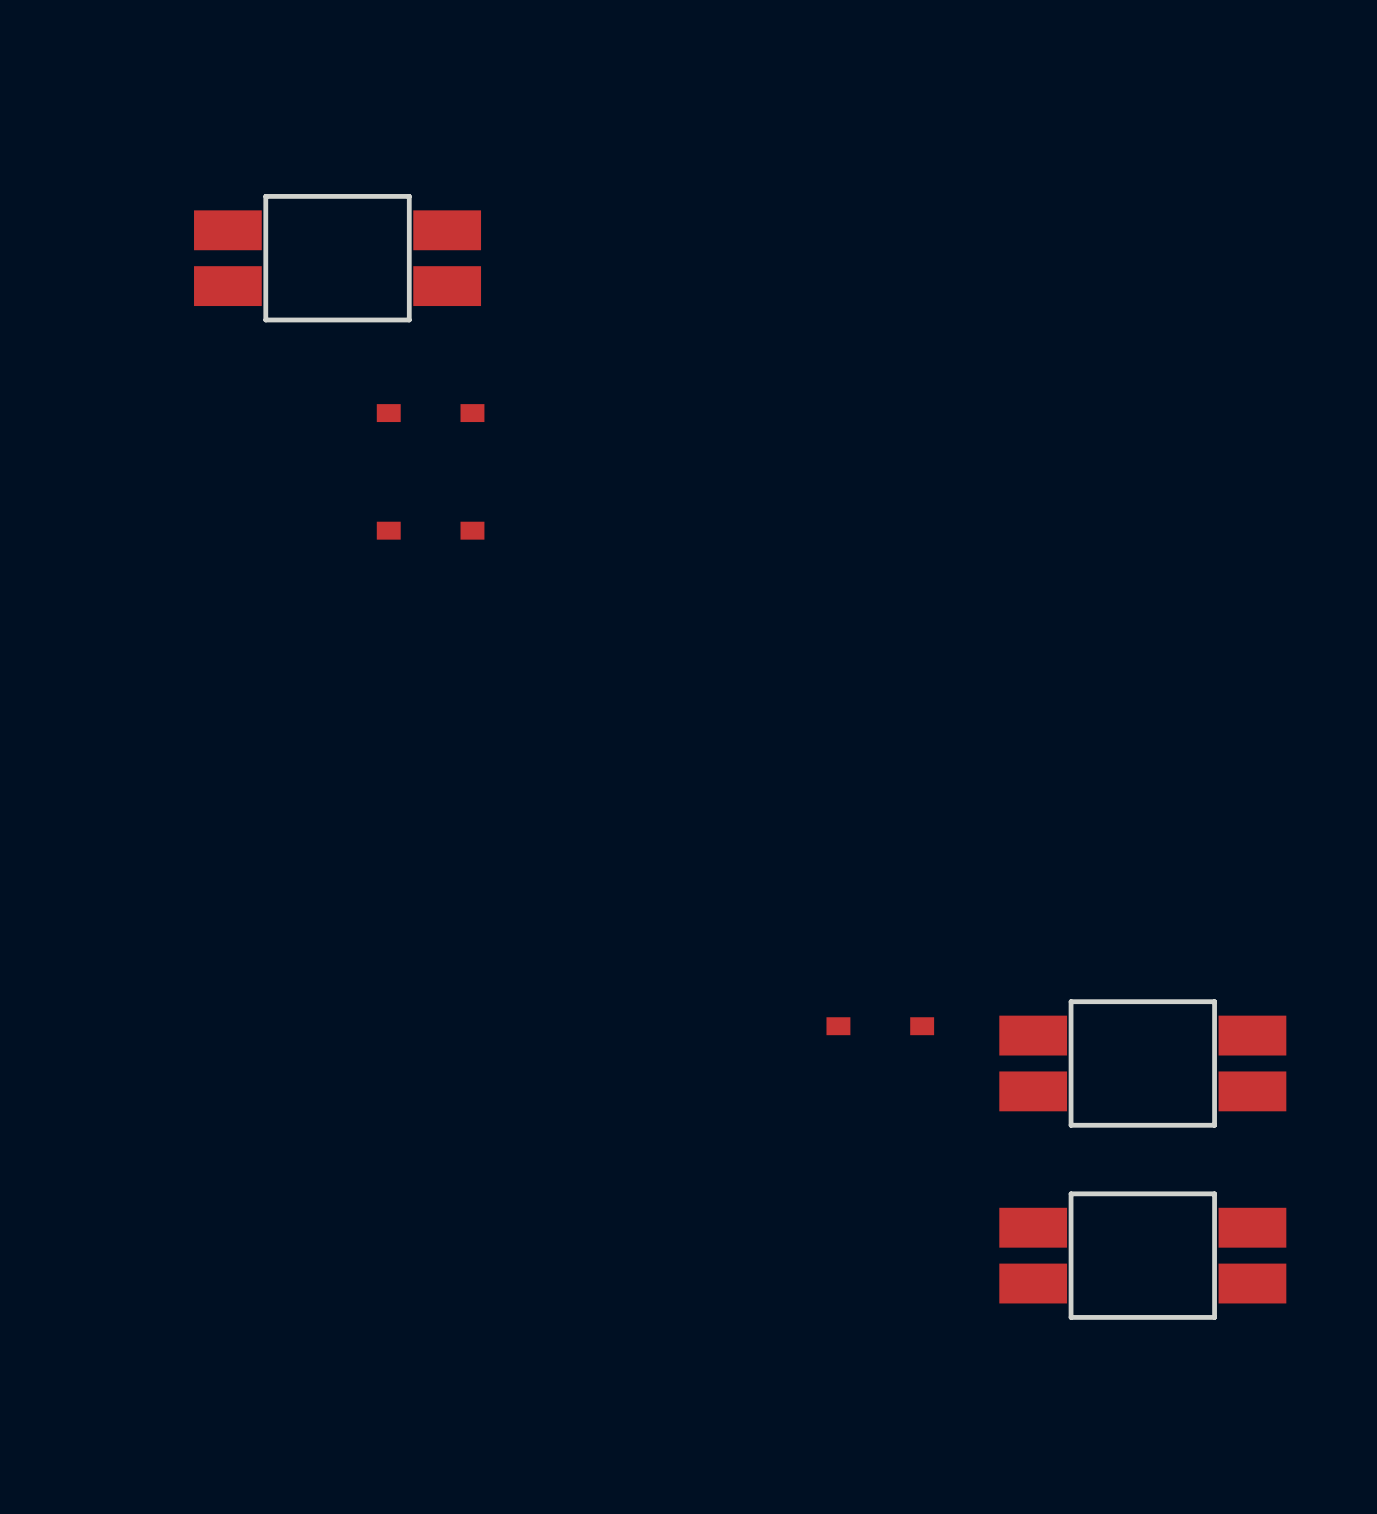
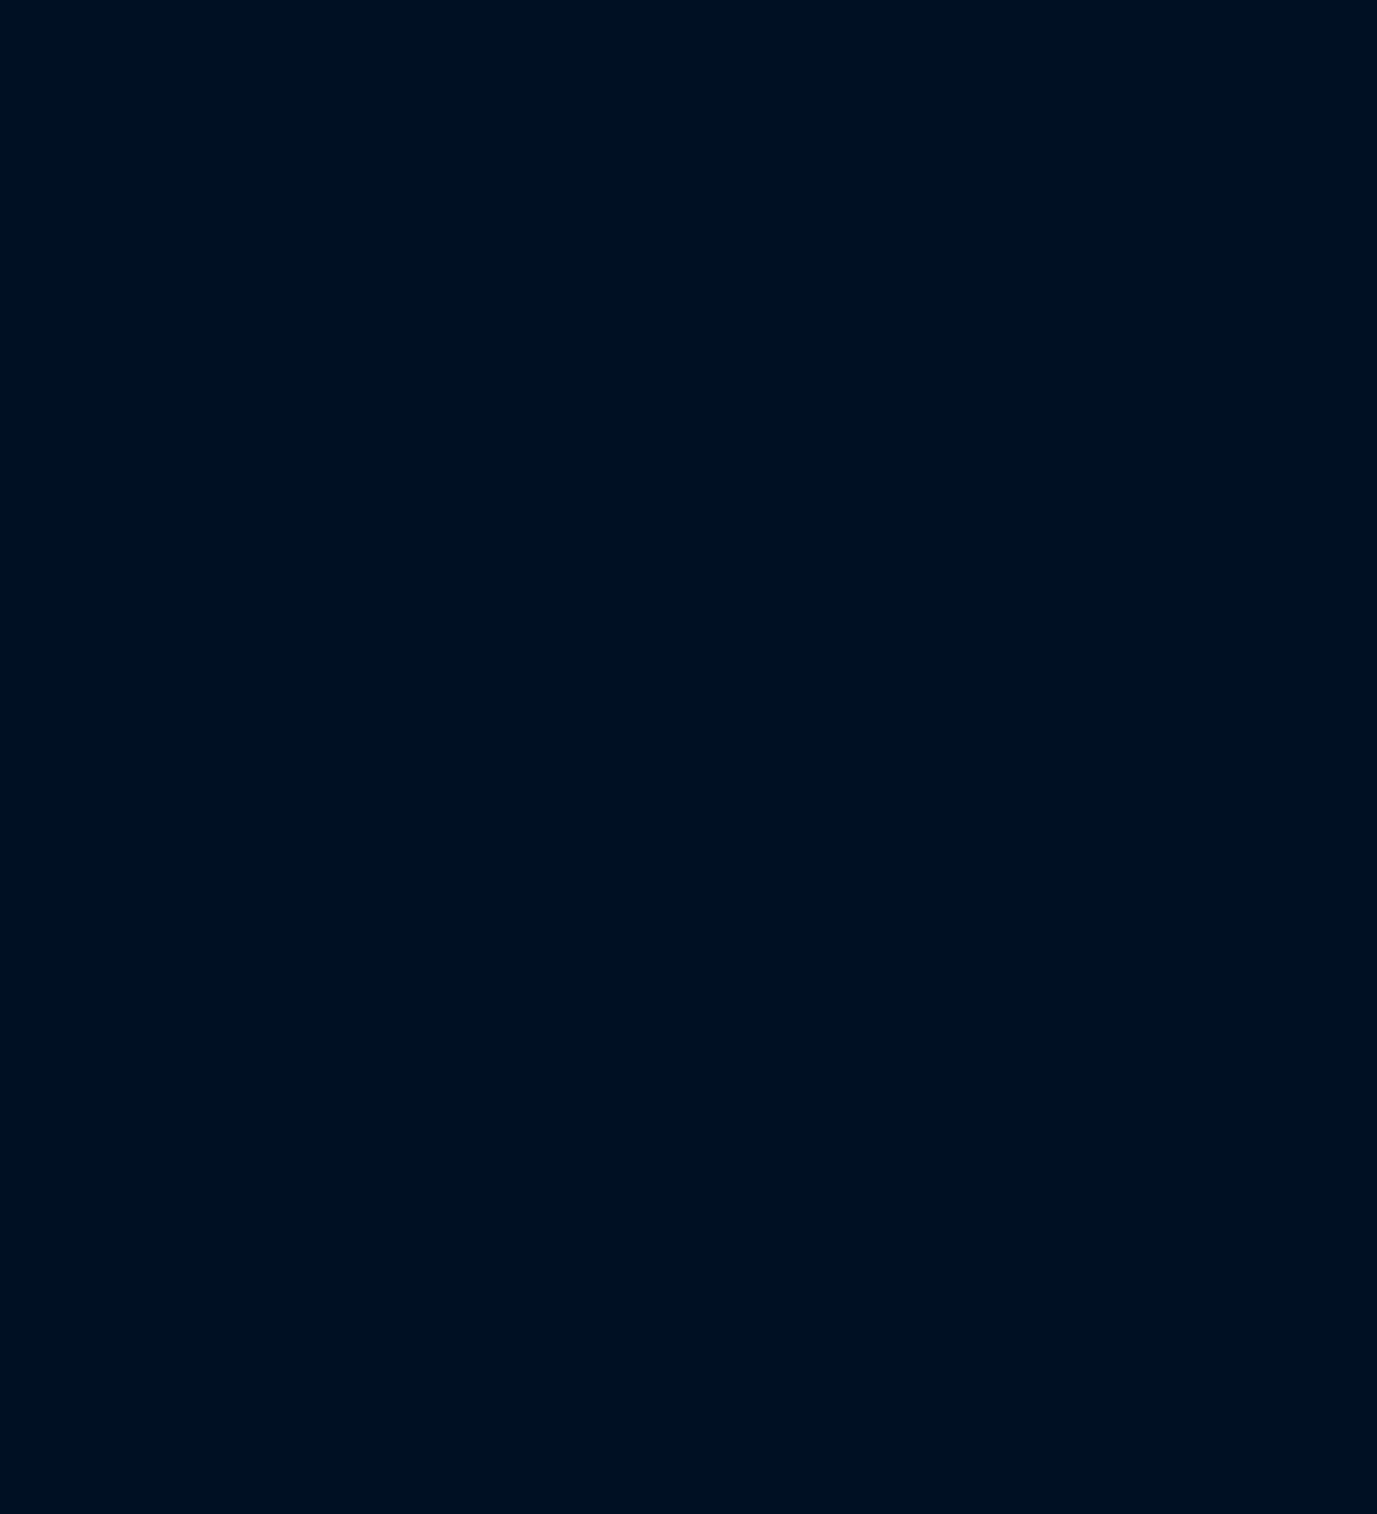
part: (337, 258) -> none
part: (430, 413) -> none
part: (430, 530) -> none
part: (880, 1026) -> none
part: (1142, 1063) -> none
part: (1142, 1255) -> none

